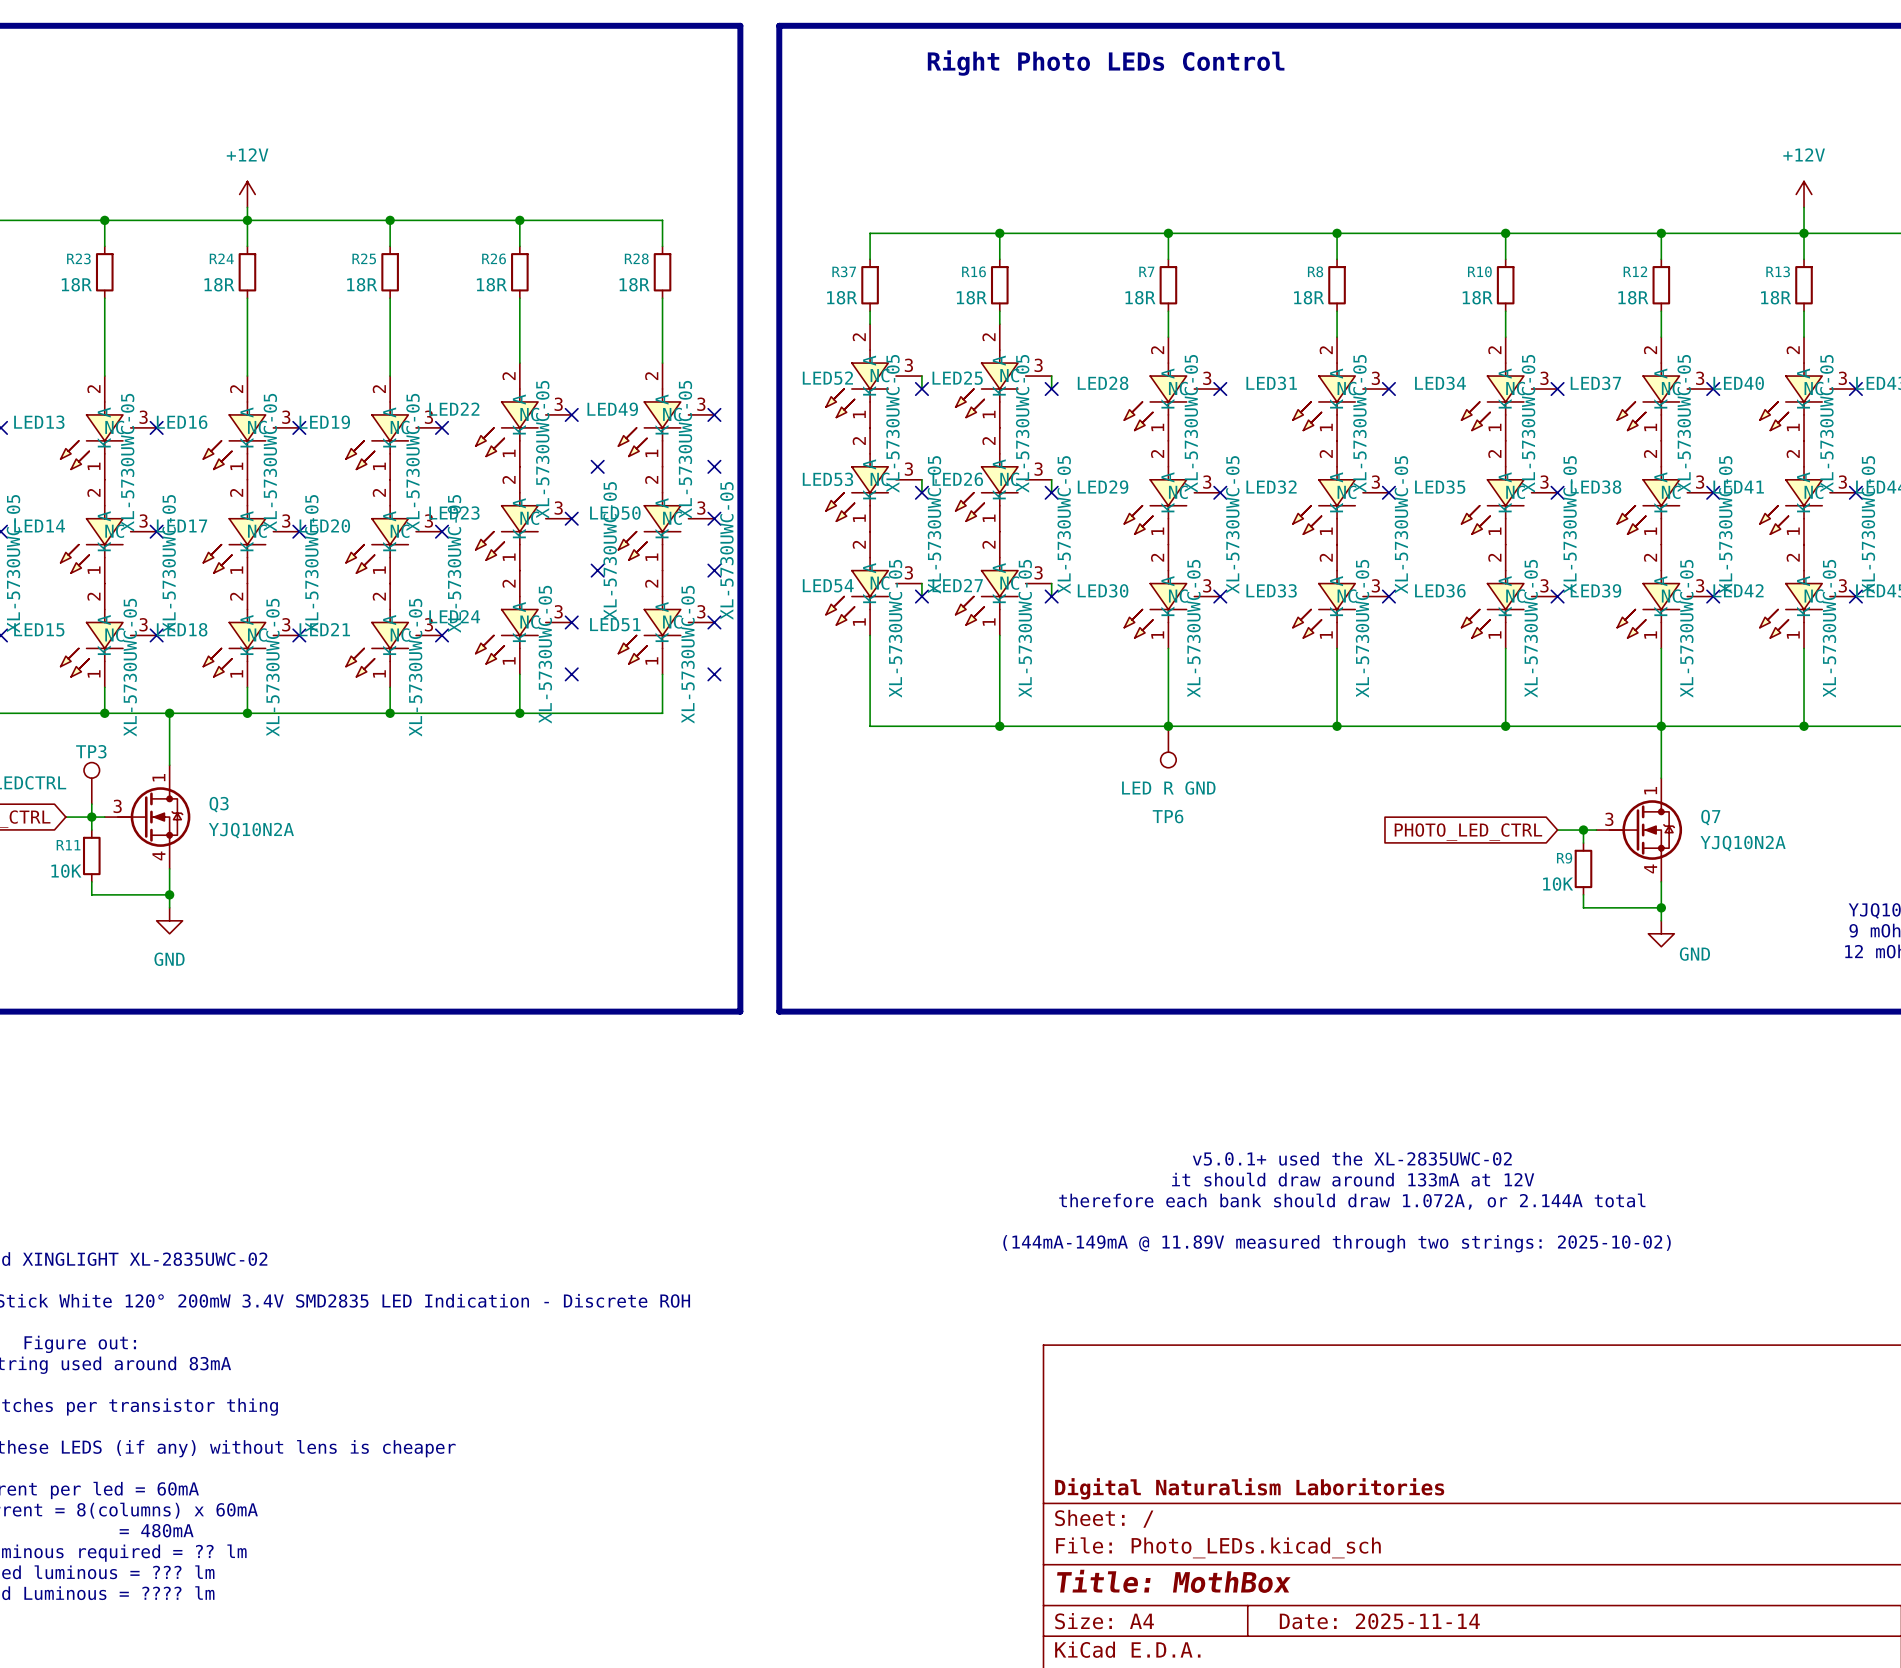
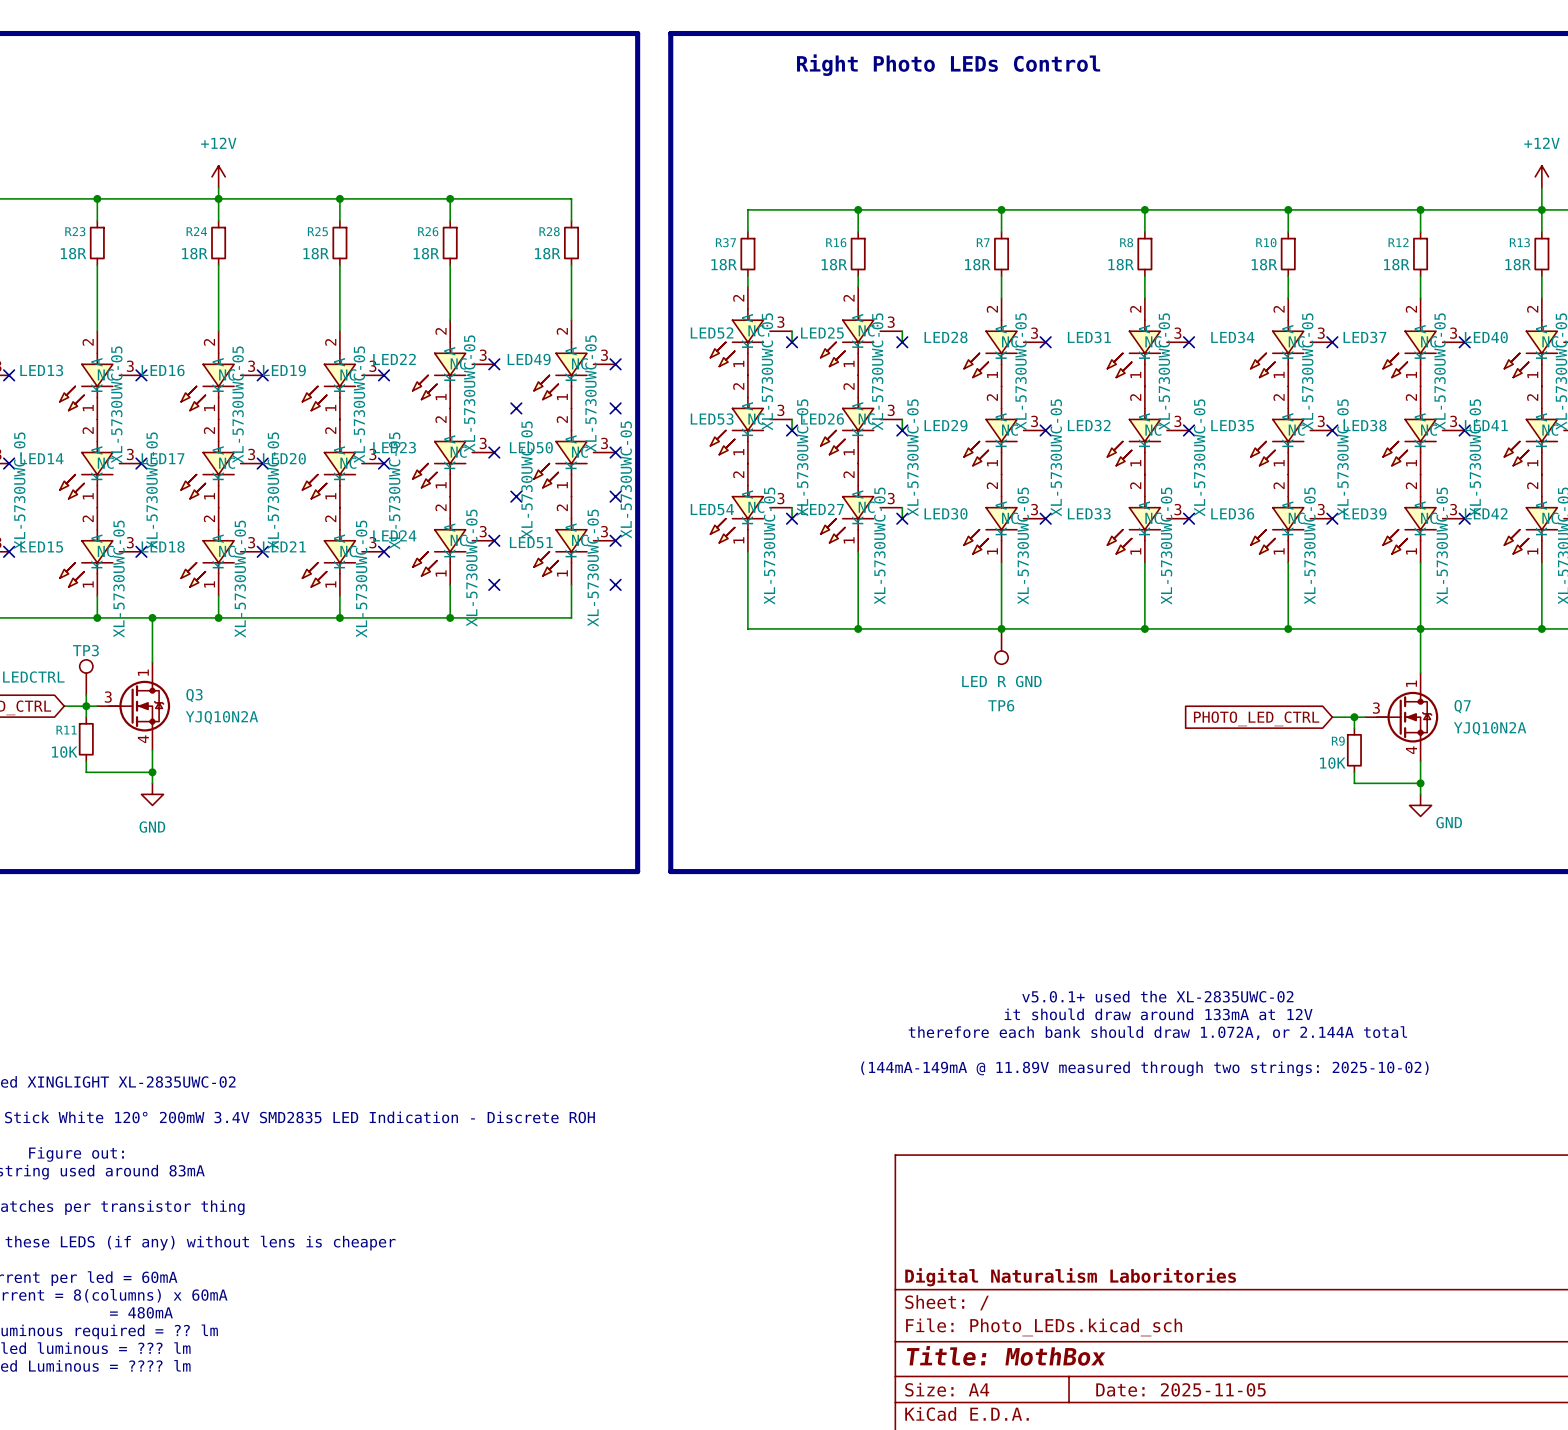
title block: Date: 2025-11-14 (1379, 1621) -> Date: 2025-11-05 (1180, 1389)

